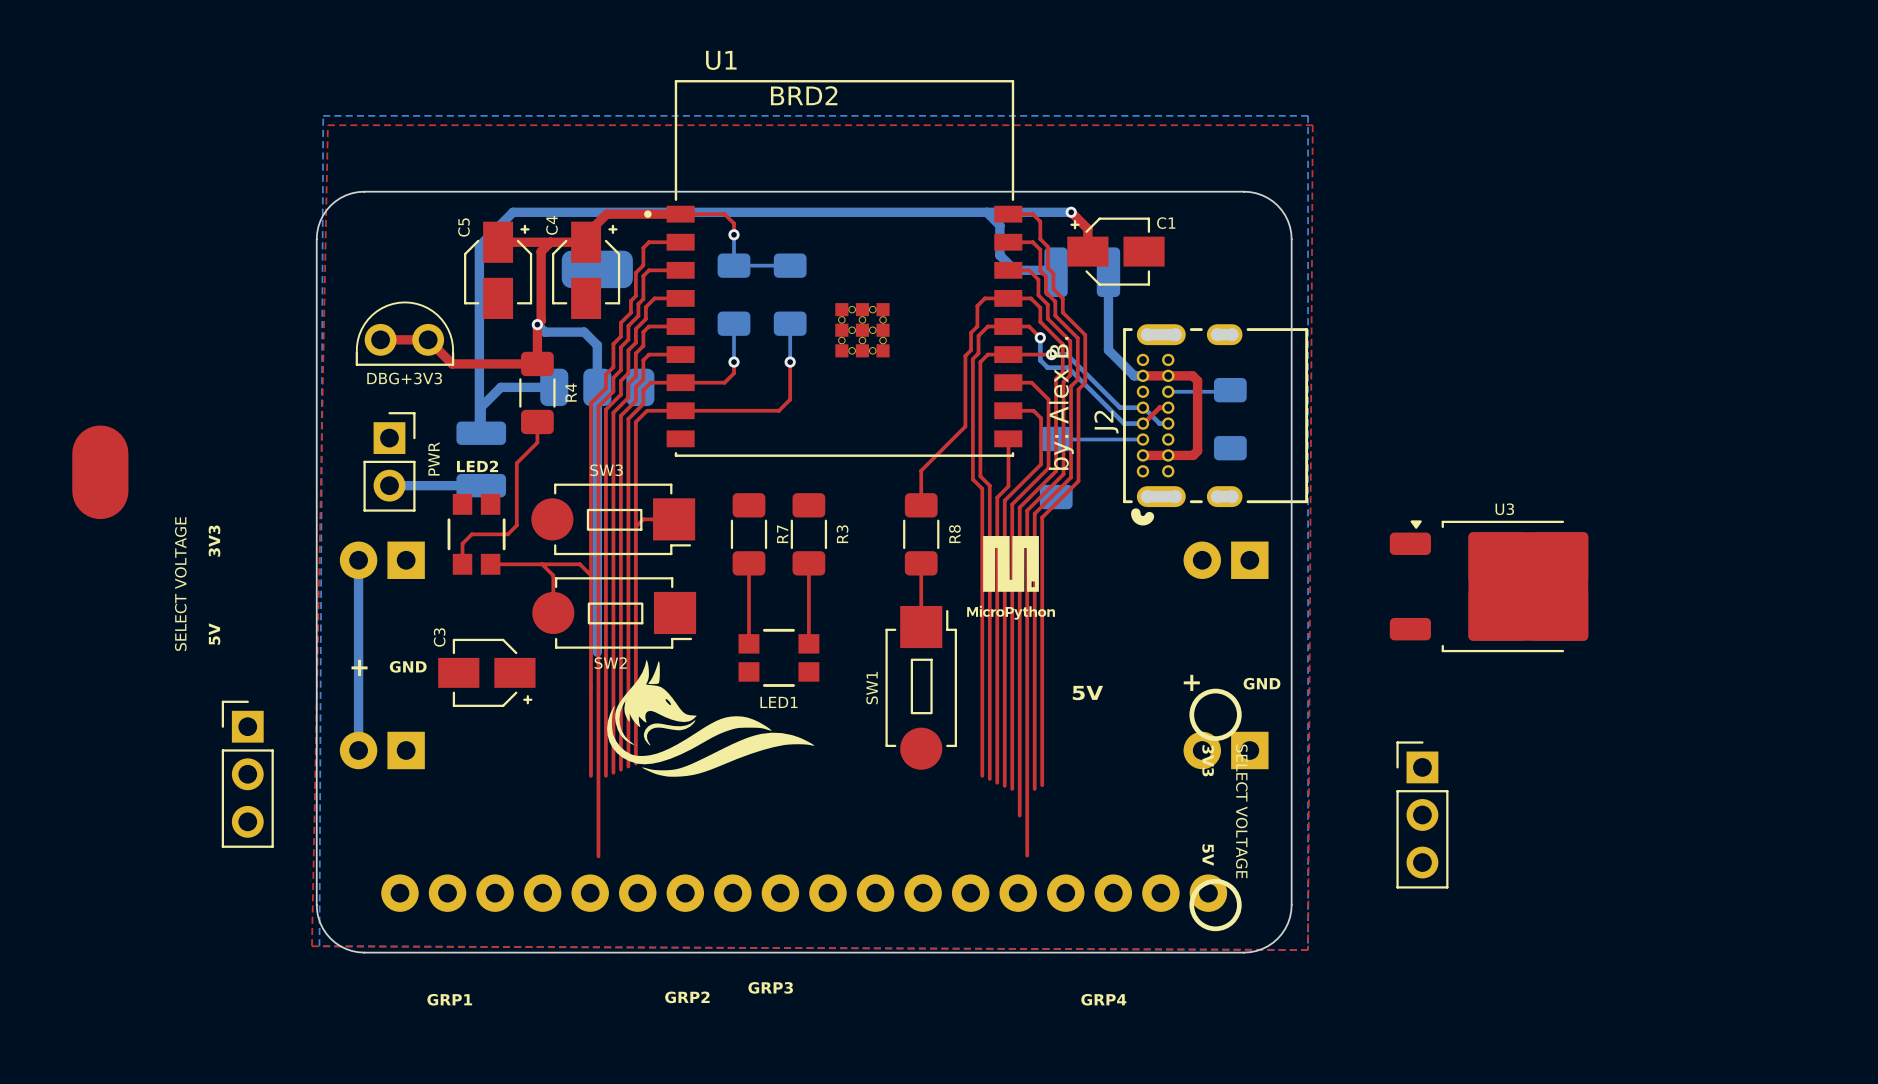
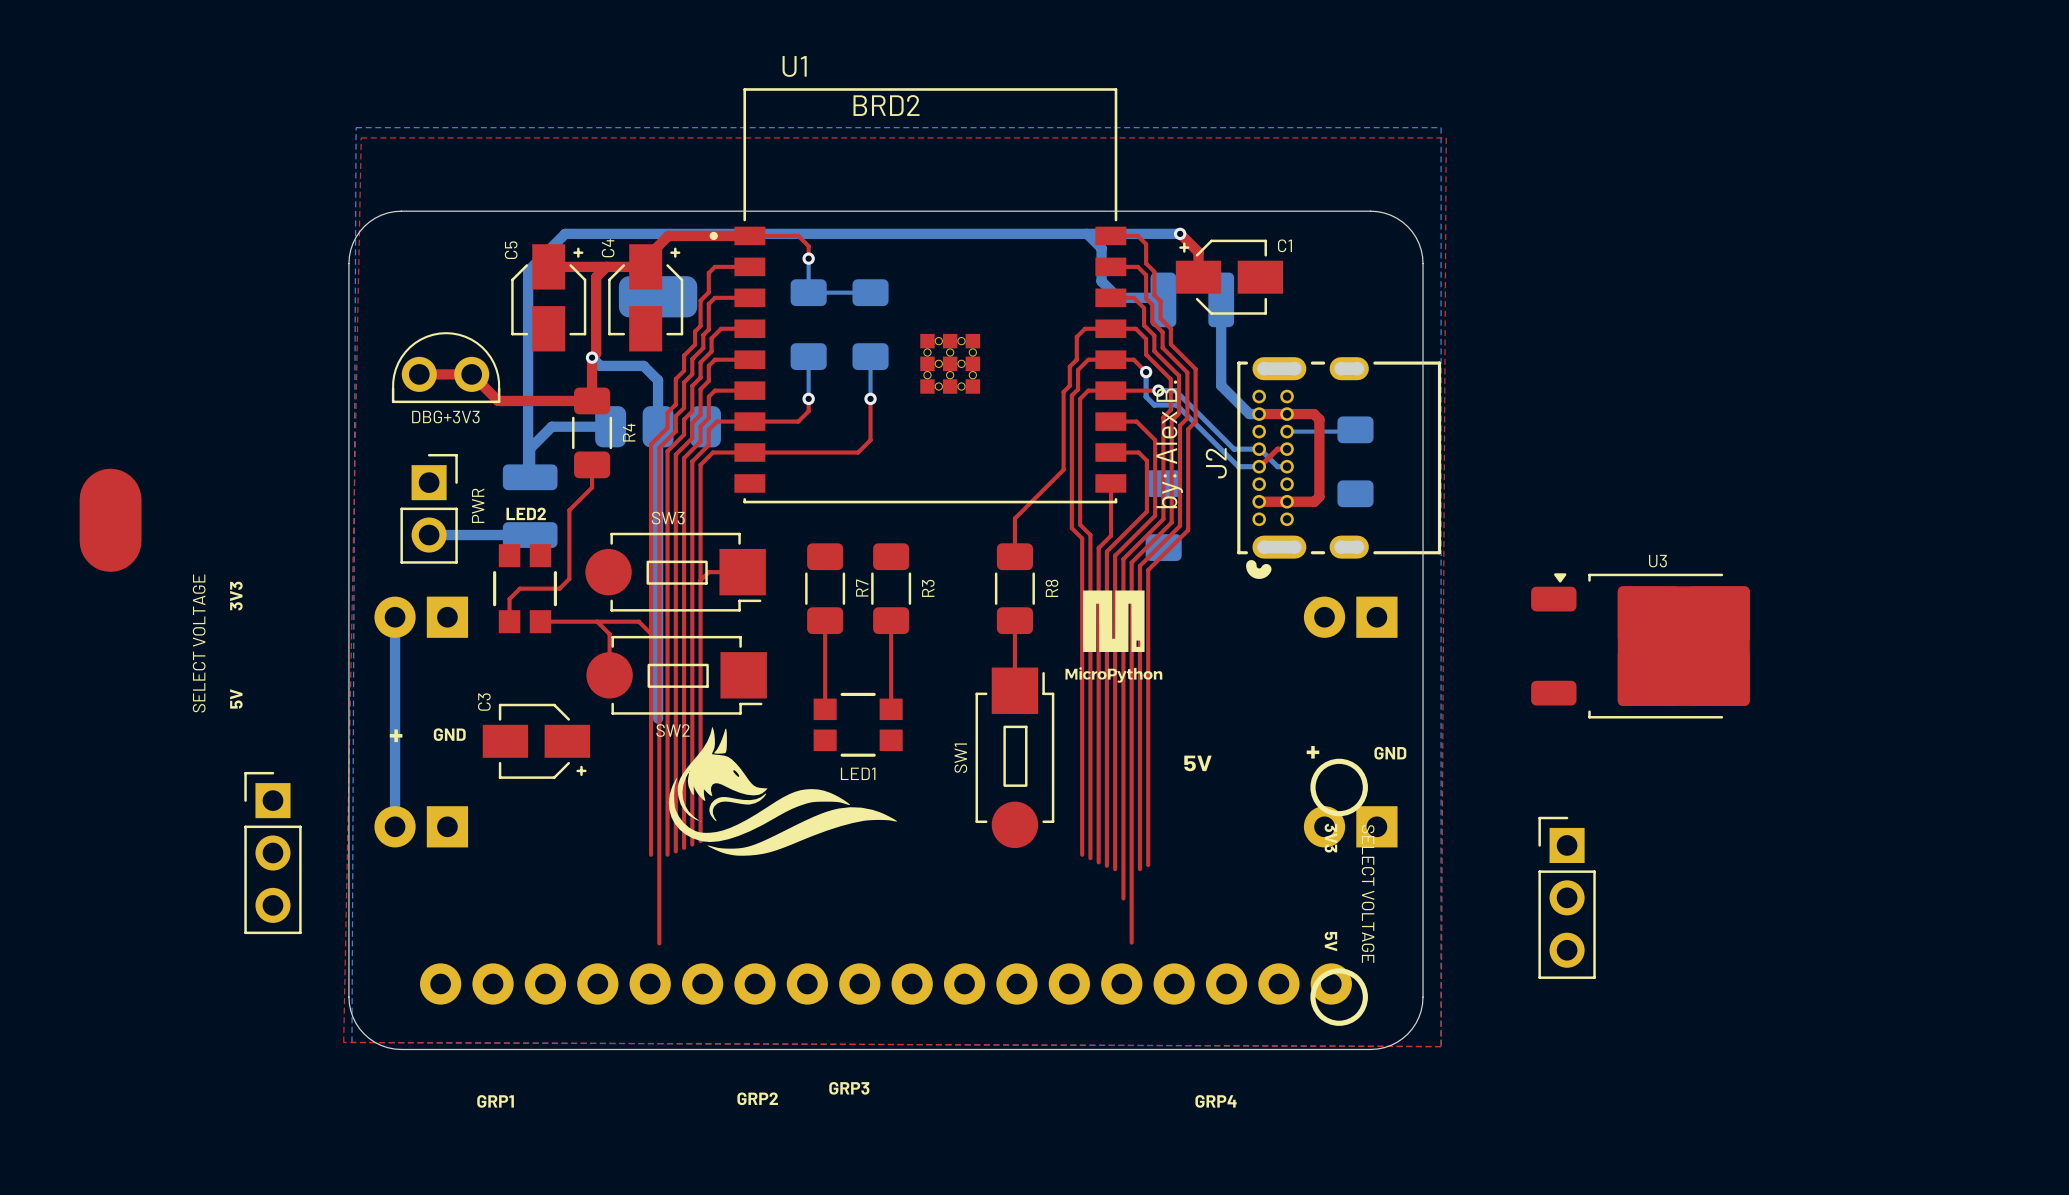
bottom track: (1056, 438) (1142, 439) -> none

